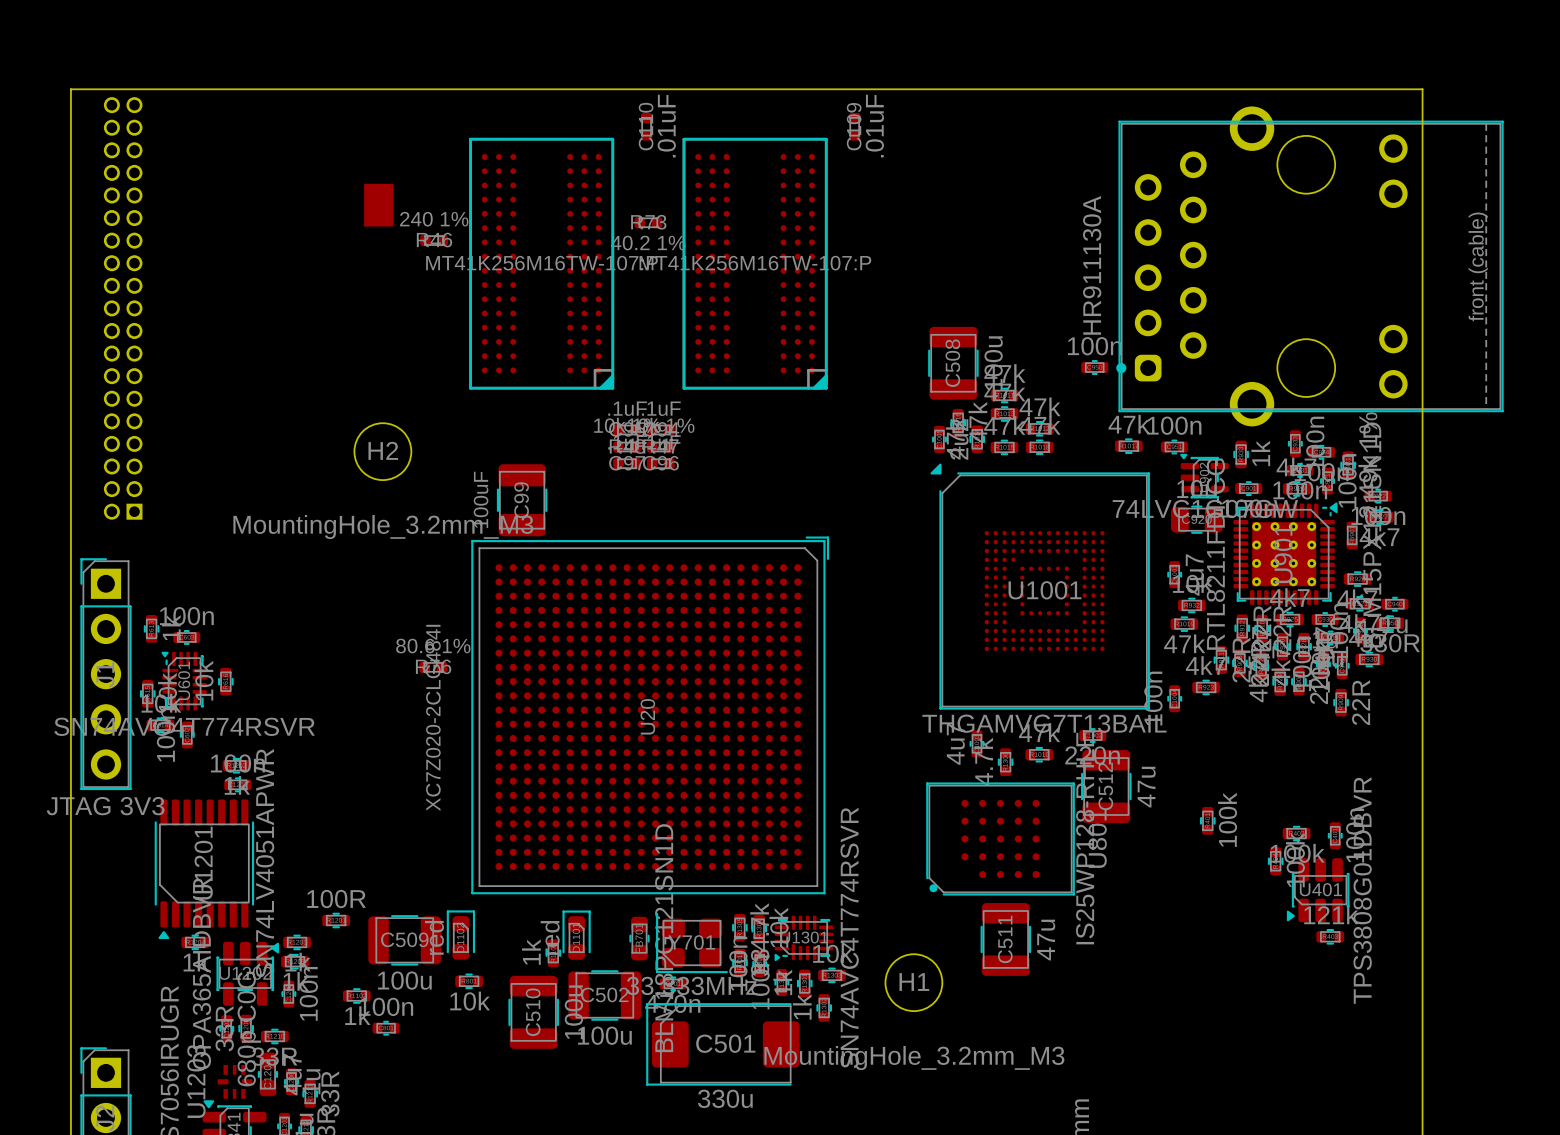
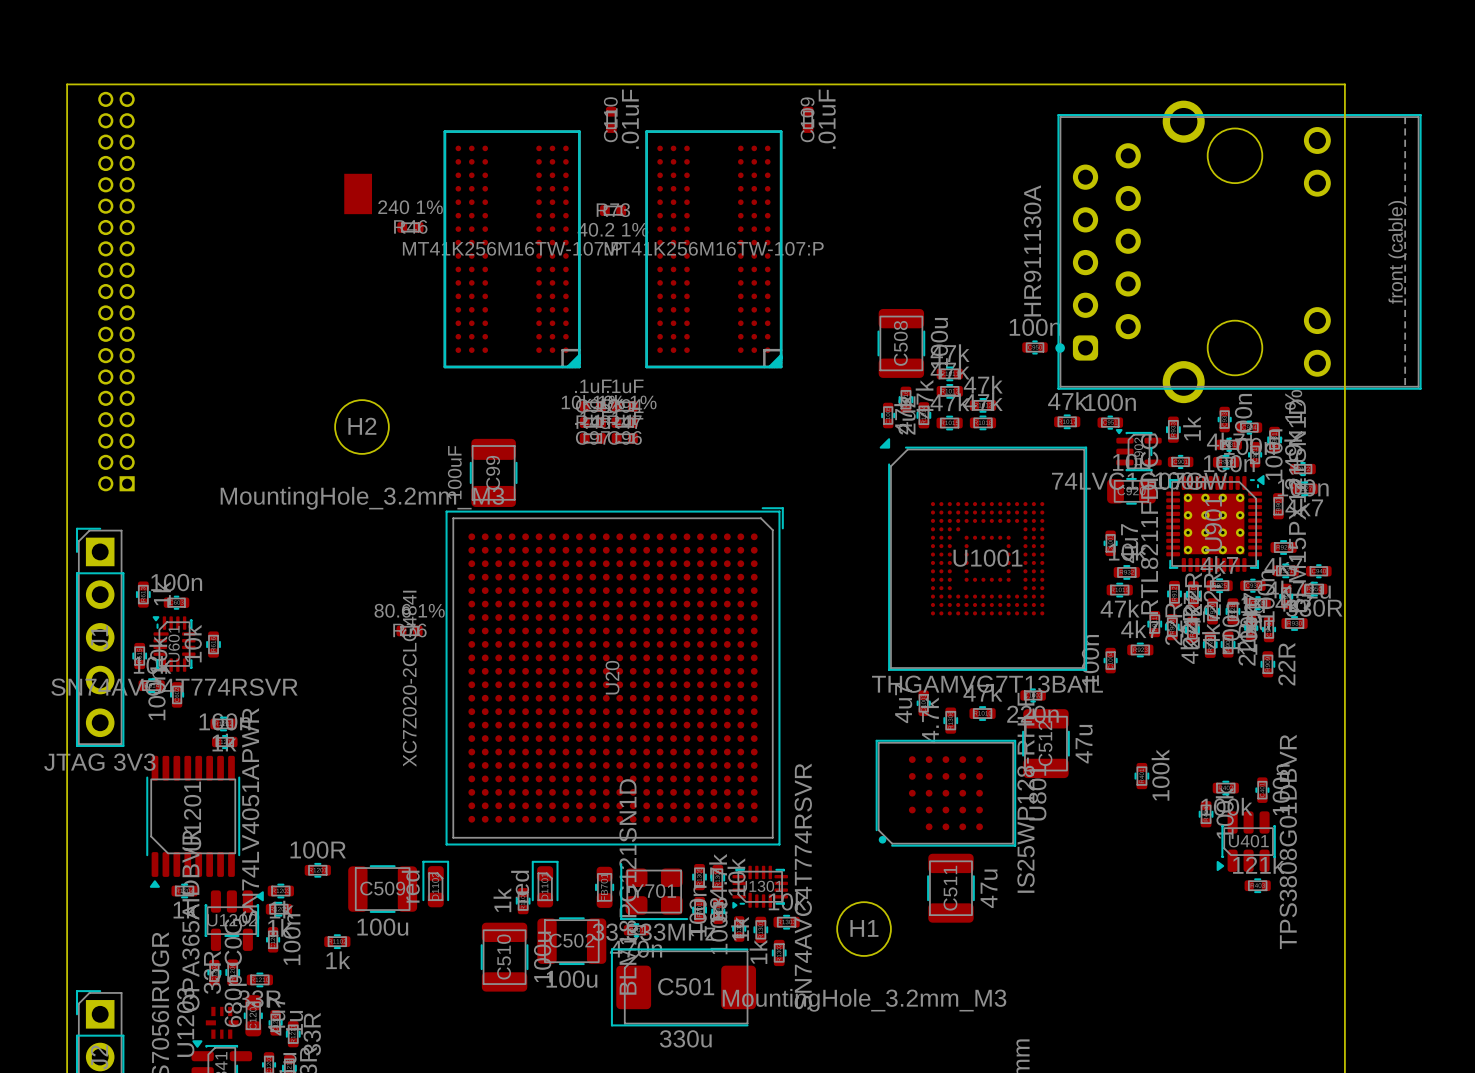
part: 10k (469, 981) -> none
part: 100n (386, 1028) -> none

